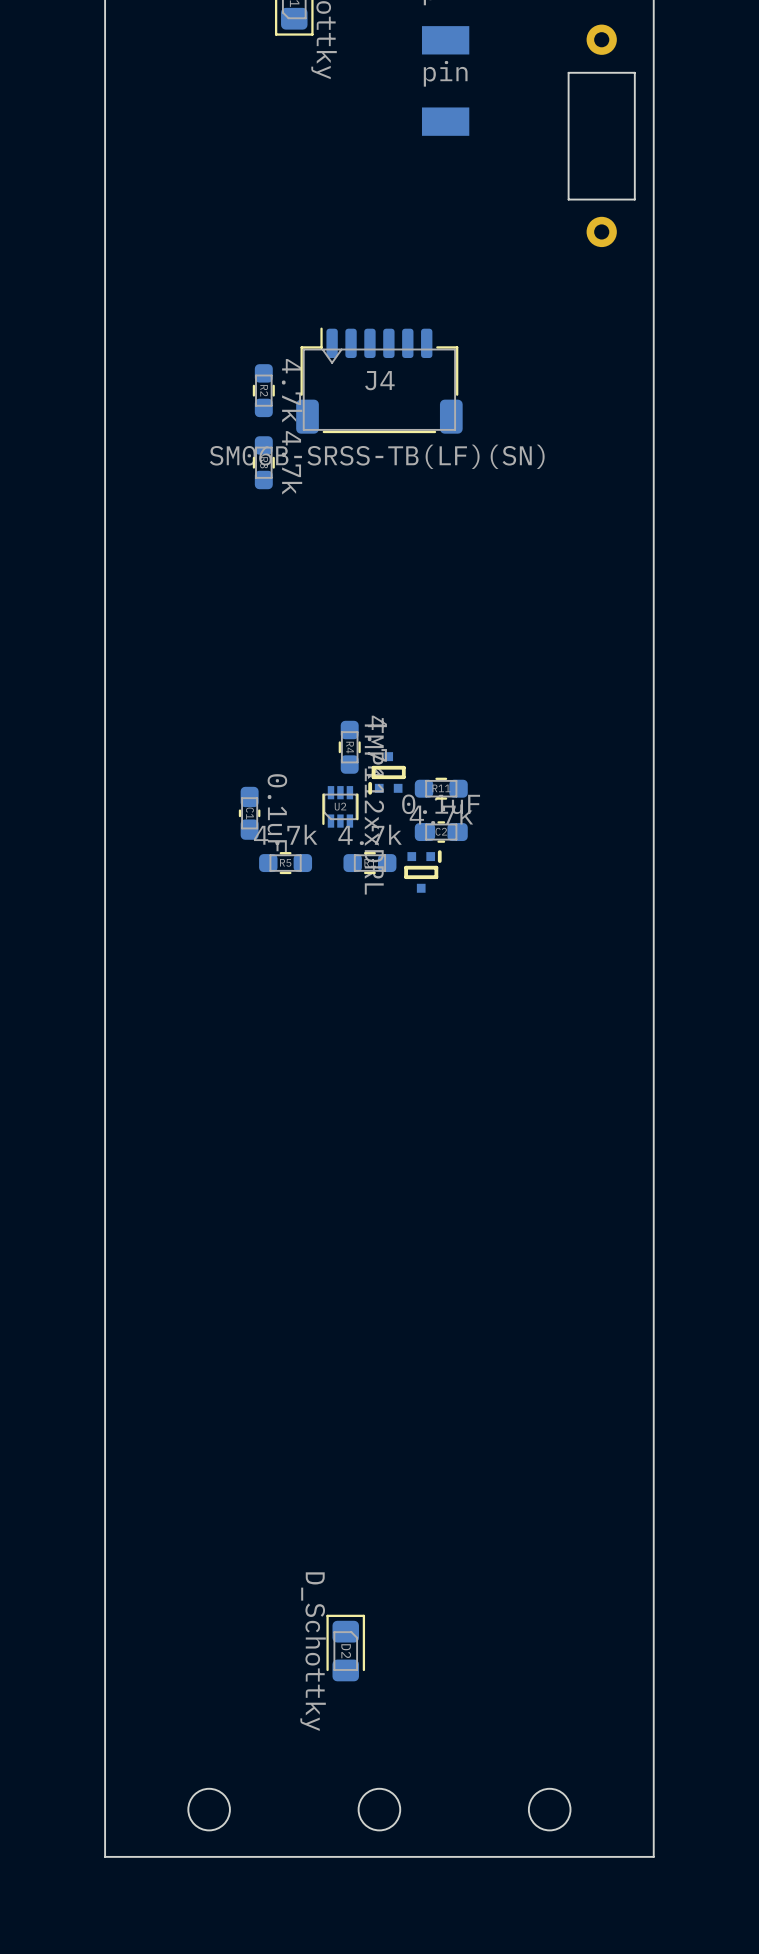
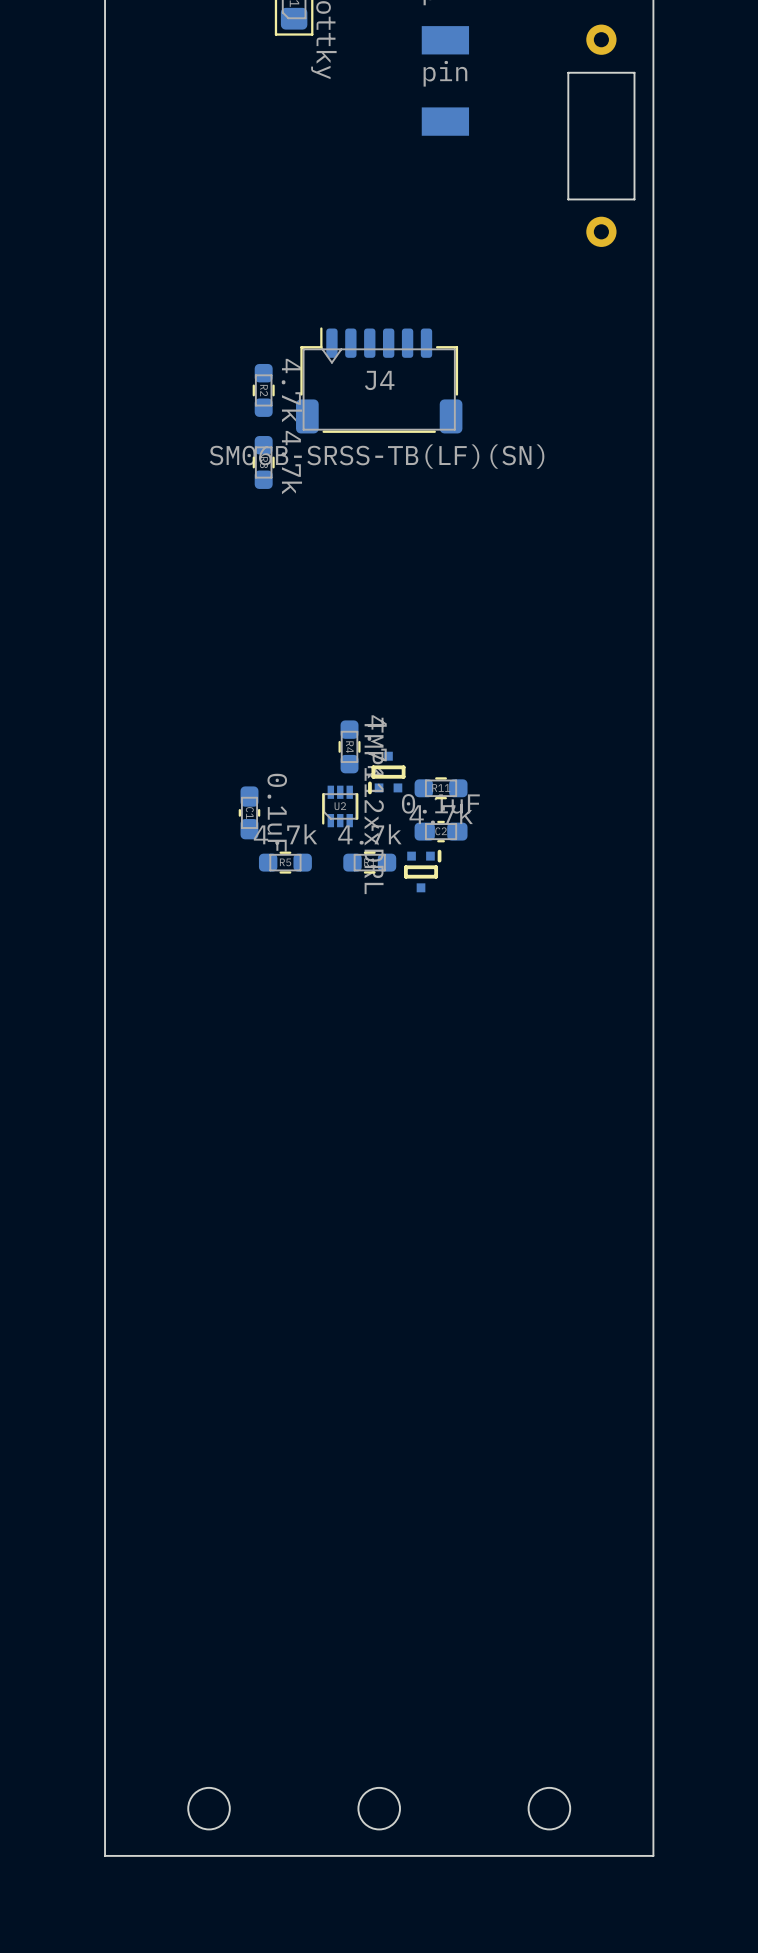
D2: D_Schottky (345, 1648) -> none

